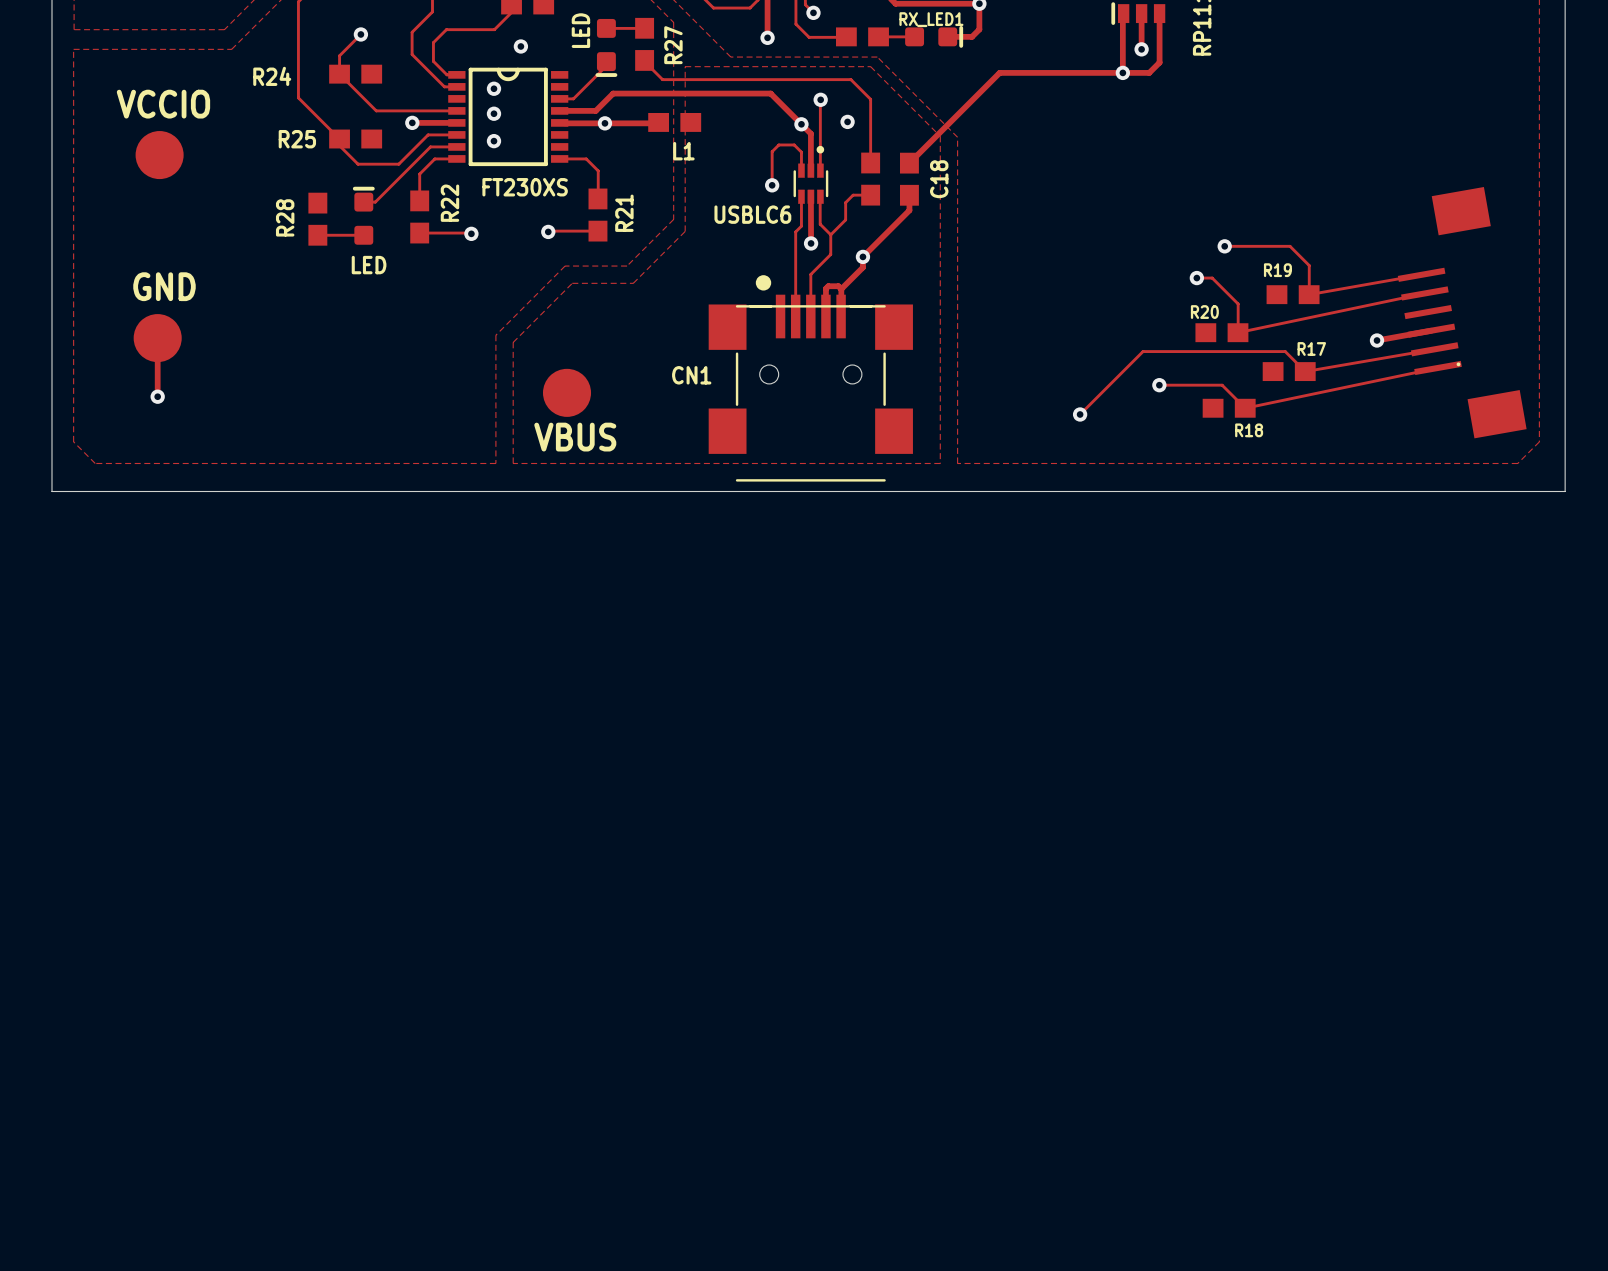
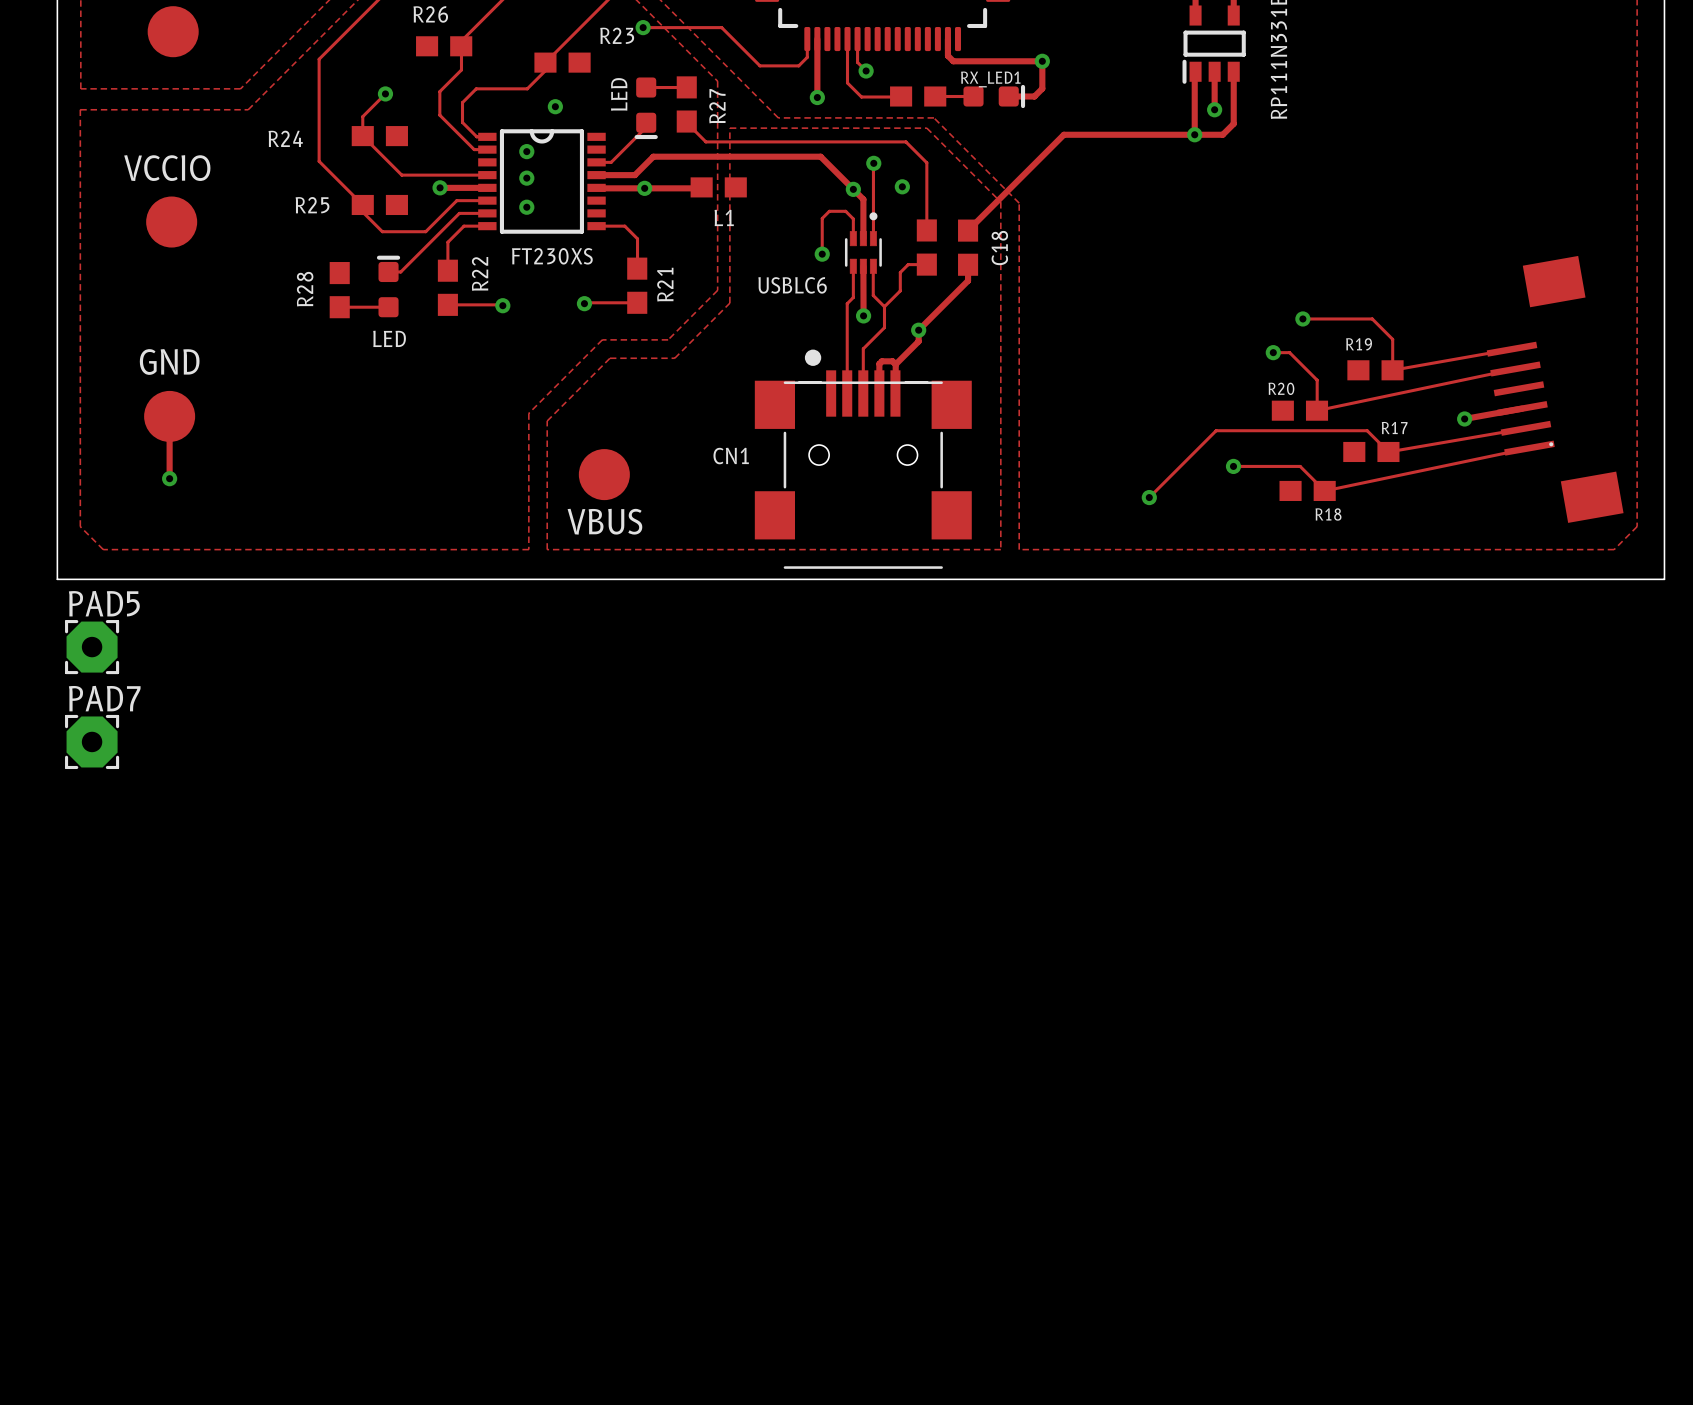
PAD5: none -> (92, 647)
PAD7: none -> (92, 741)

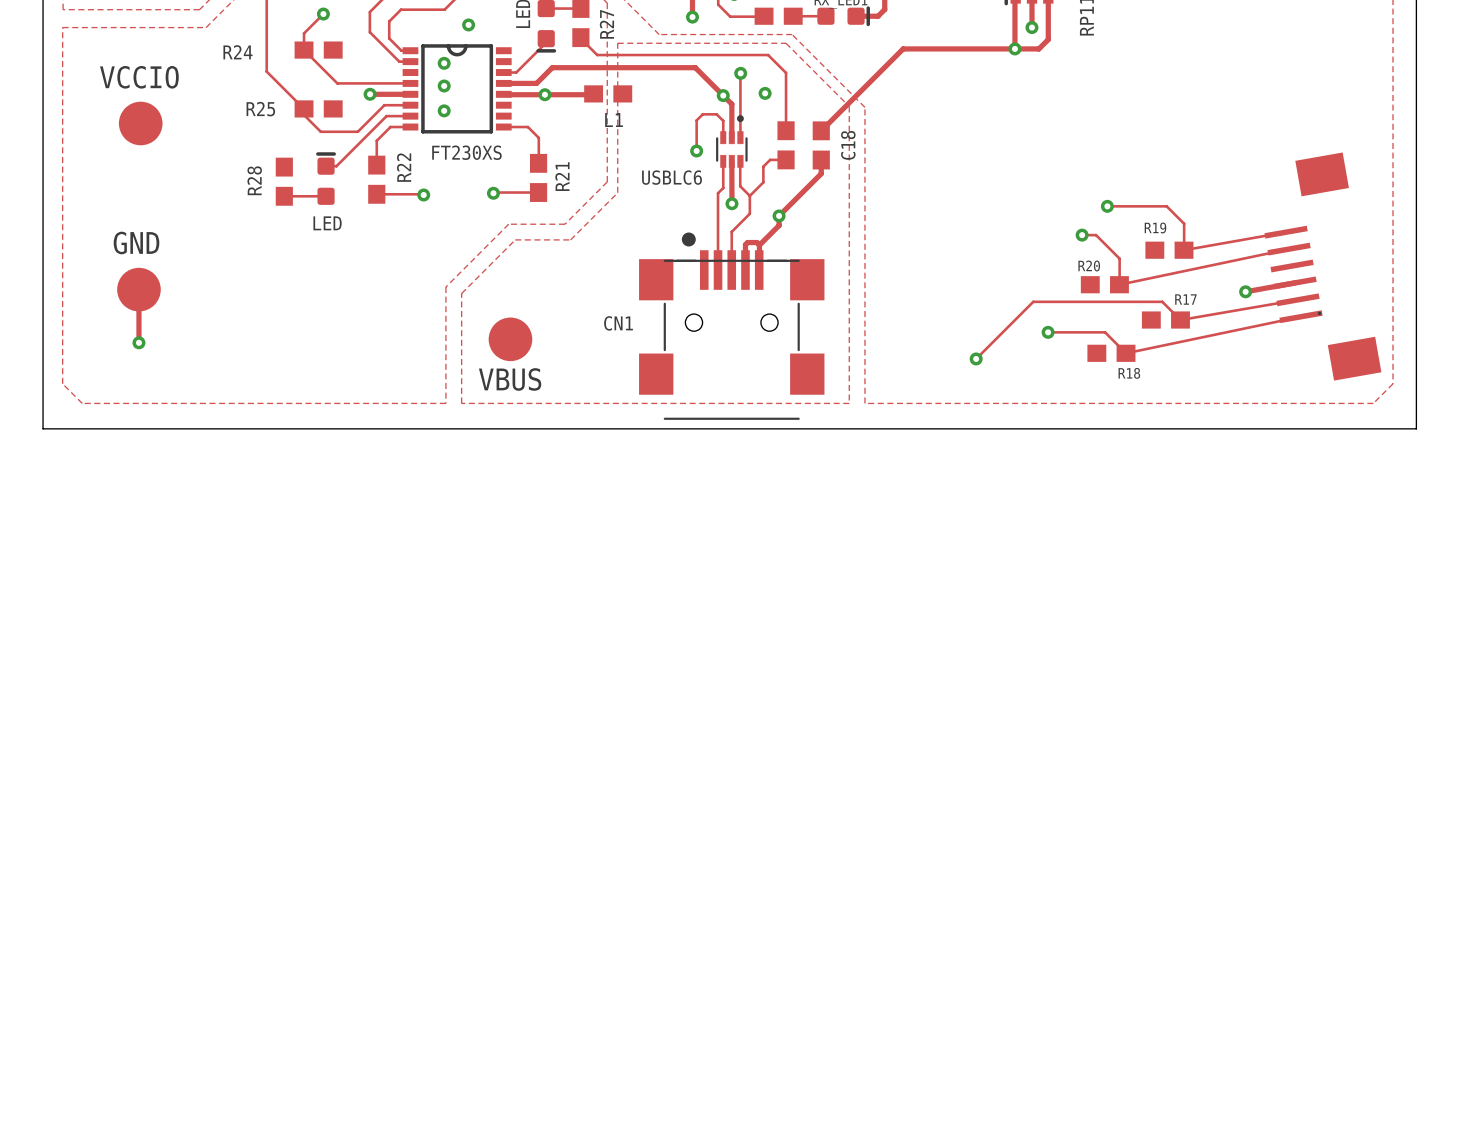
PAD5: (92, 647) -> none
PAD7: (92, 741) -> none

